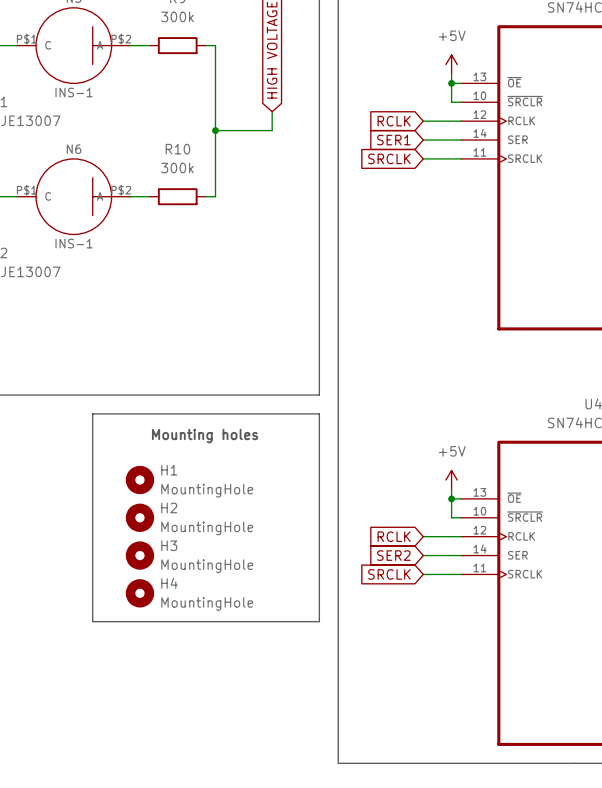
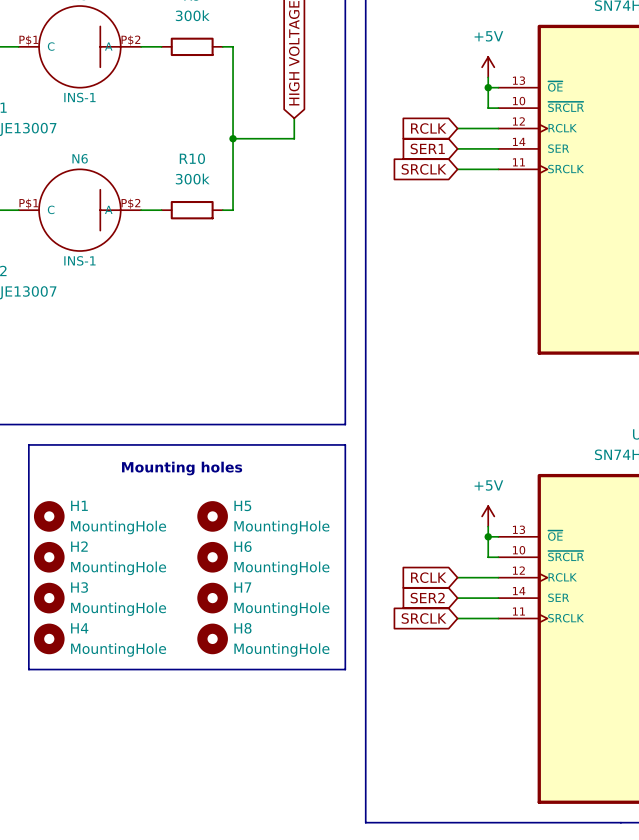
line: (92, 413) (92, 621) -> (100, 444) (28, 444) (28, 669) (100, 669)
text position: Mounting holes (205, 436) -> Mounting holes (182, 468)
H1 position: (139, 480) -> (49, 516)
H5: none -> MountingHole (212, 516)
H2 position: (139, 517) -> (49, 557)
H6: none -> MountingHole (212, 557)
H3 position: (139, 555) -> (49, 598)
H7: none -> MountingHole (212, 598)
H4 position: (139, 593) -> (49, 638)
H8: none -> MountingHole (212, 638)

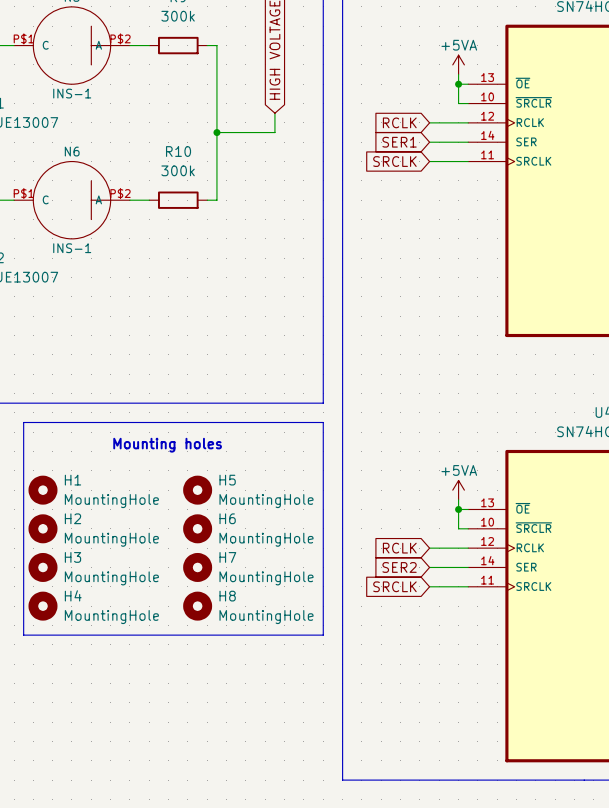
power symbol: +5V (488, 67) -> +5VA (458, 64)
power symbol: +5V (488, 516) -> +5VA (458, 490)

